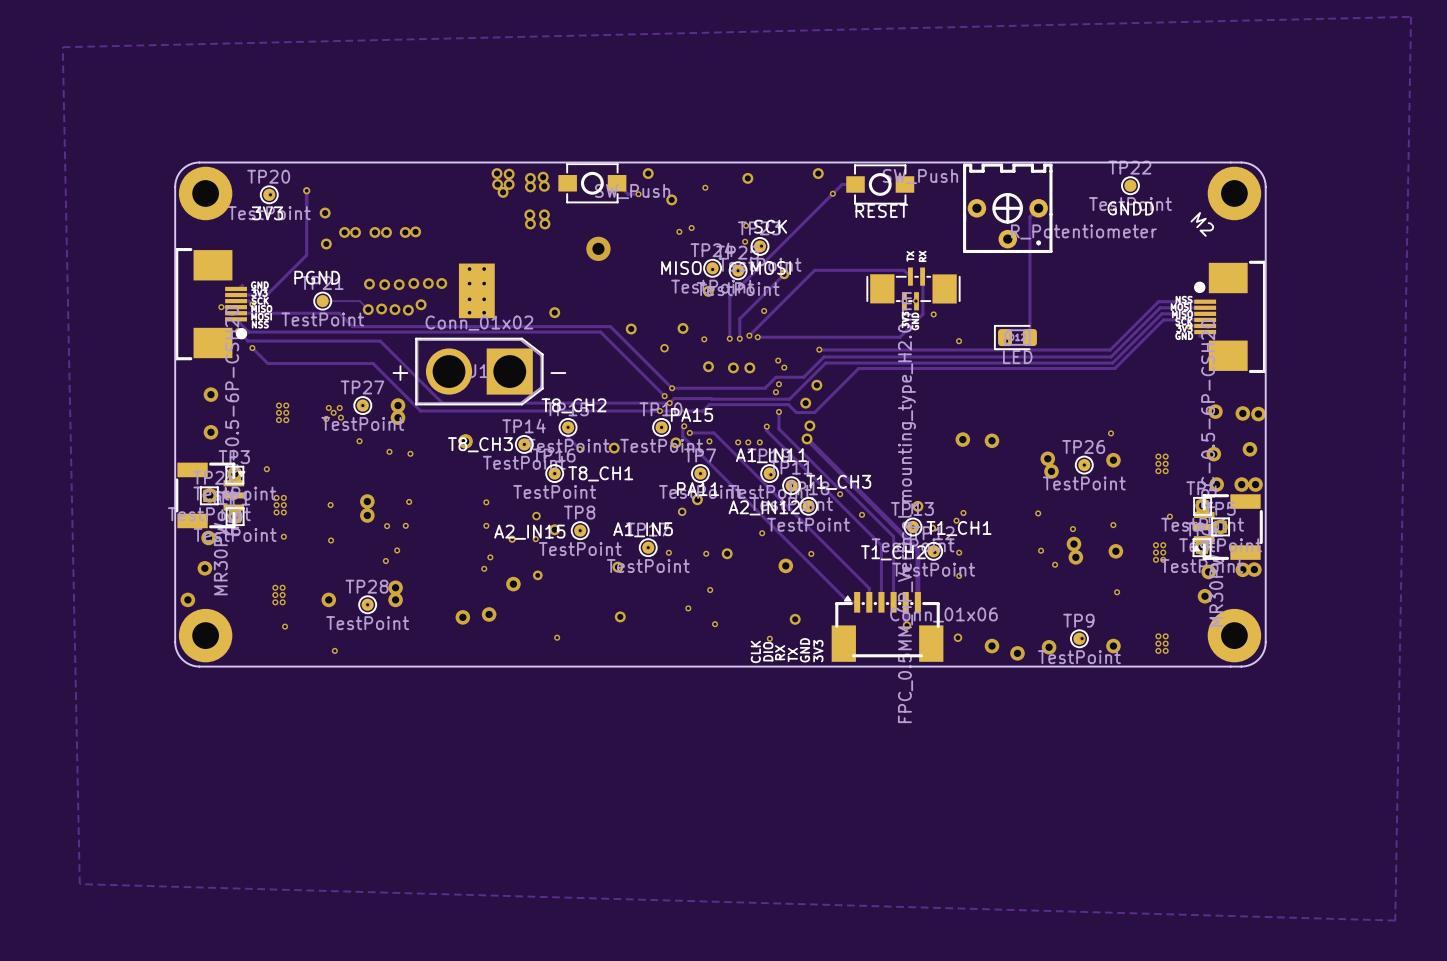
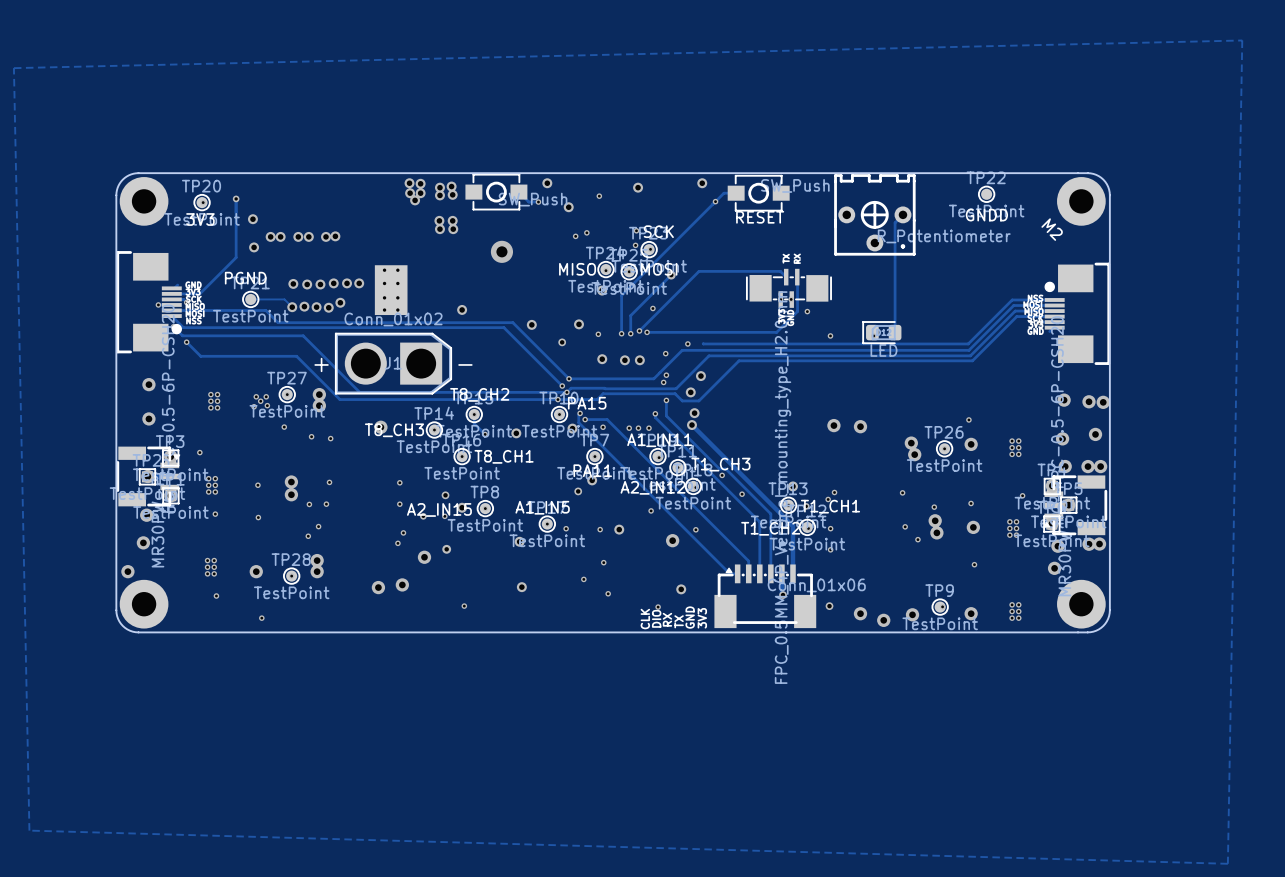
via: none -> (687, 343)
via: (819, 349) -> none
track: (824, 356) (803, 377) (776, 377) -> (707, 350) (682, 350) (663, 368)
via: (784, 367) -> none

